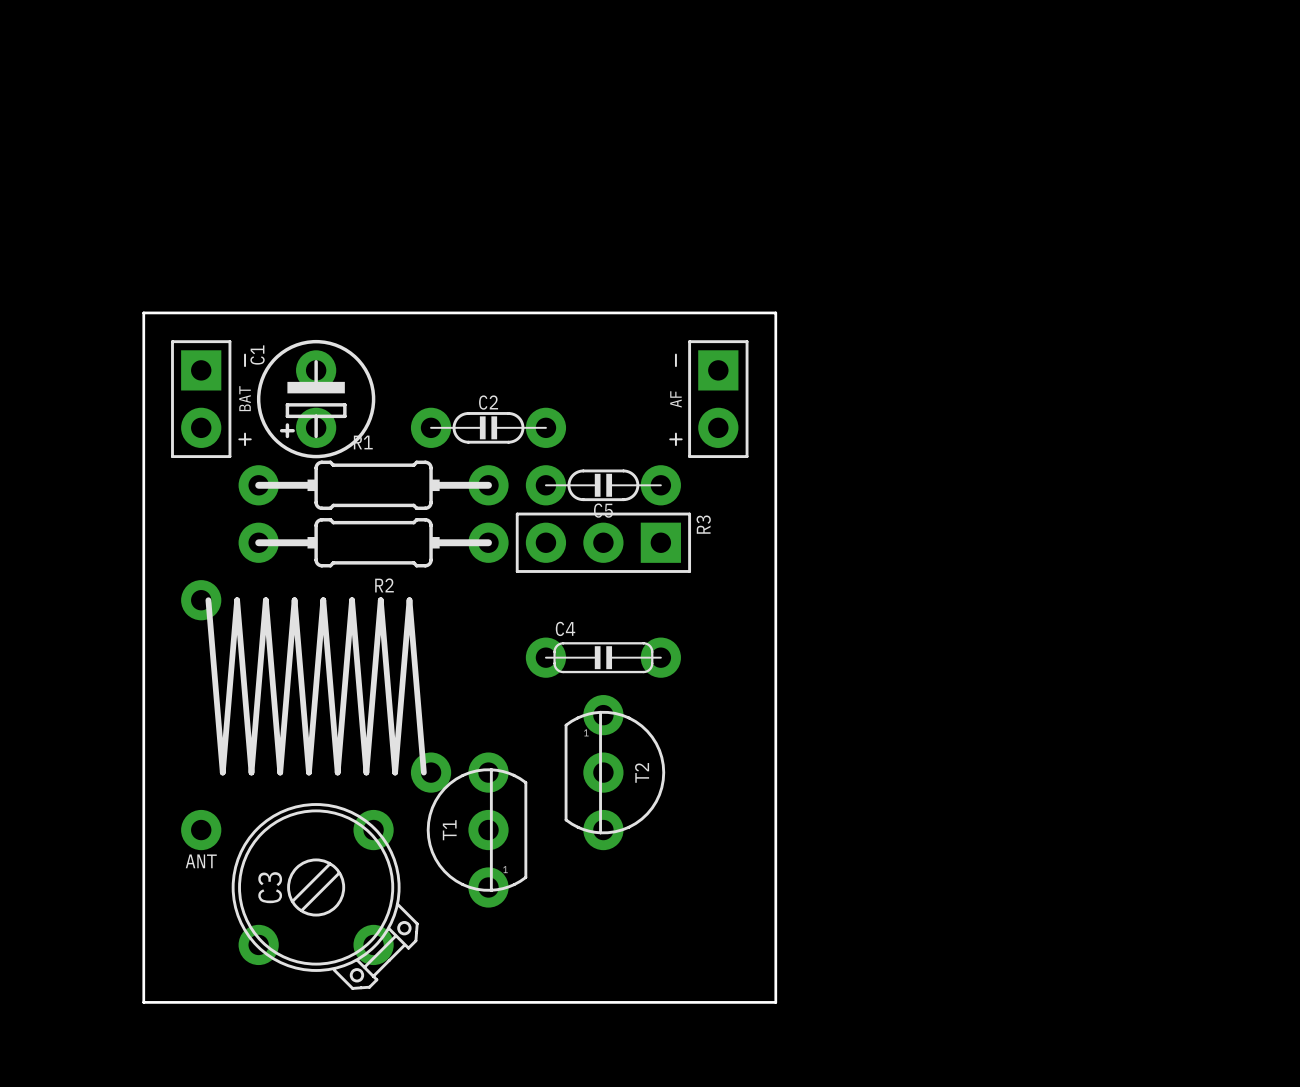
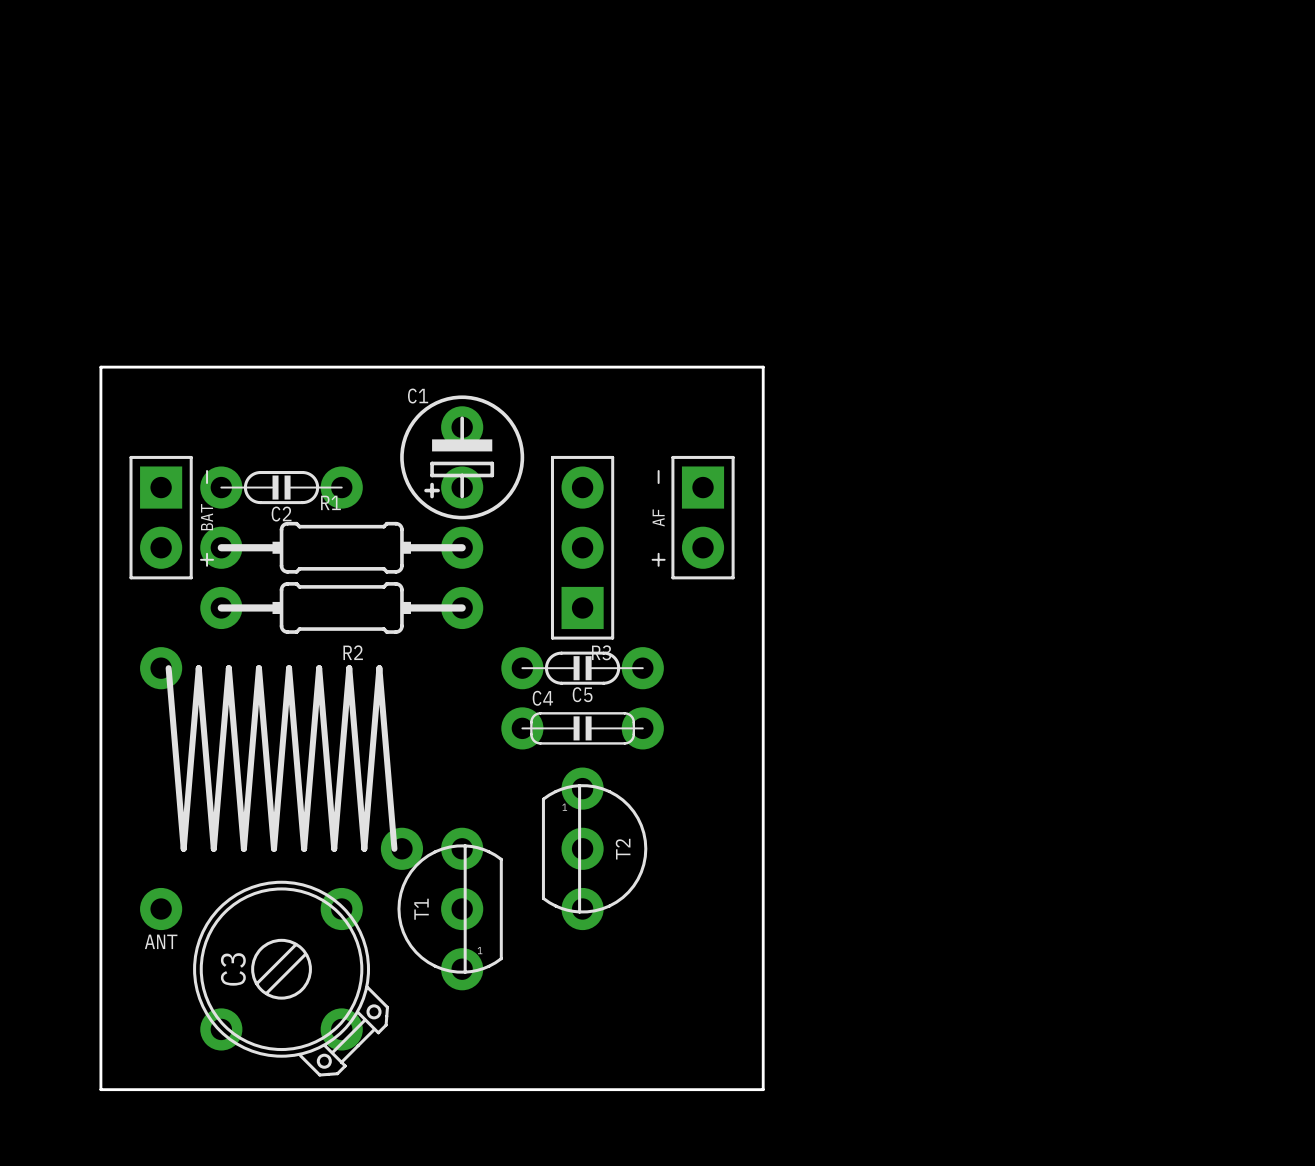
C1 name rotation: 0° (257, 355) -> 90° clockwise (418, 396)
BAT position: (211, 399) -> (171, 517)
C1 position: (316, 399) -> (462, 457)
AF position: (708, 399) -> (693, 517)
C2 name position: C2 (488, 402) -> C2 (281, 514)
C2 position: (488, 427) -> (281, 487)
C5 position: (603, 485) -> (582, 668)
R3 rotation: 0° (603, 542) -> 90° clockwise (582, 547)

